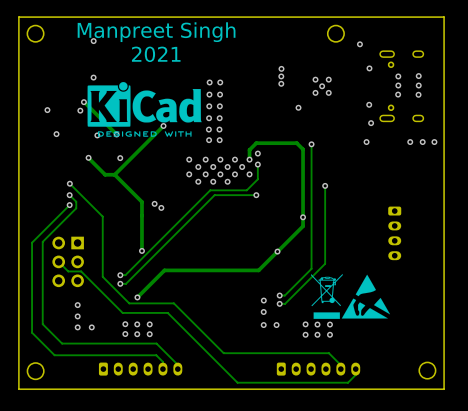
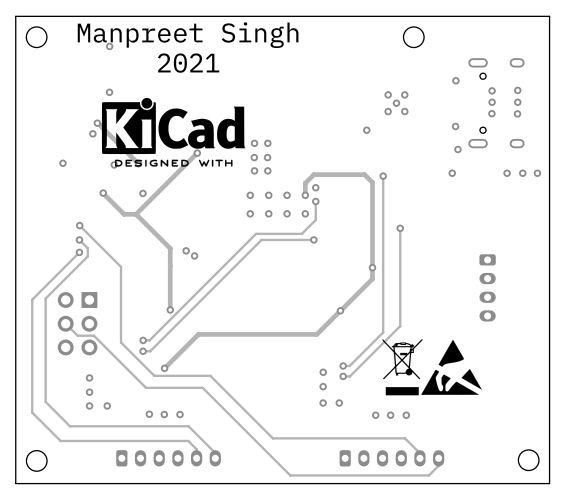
via: (359, 44) -> none
via: (281, 68) -> none
via: (281, 76) -> none
via: (209, 82) -> none
via: (220, 82) -> none
via: (281, 83) -> none
via: (209, 94) -> none
via: (220, 94) -> none
via: (209, 106) -> none
via: (219, 106) -> none
via: (47, 110) -> none
via: (189, 159) -> none
via: (198, 167) -> none
via: (213, 167) -> none
via: (227, 167) -> none
via: (242, 167) -> none
via: (189, 174) -> none
via: (198, 181) -> none
via: (213, 181) -> none
via: (227, 181) -> none
via: (125, 324) -> none
via: (137, 324) -> none
via: (149, 324) -> none
via: (305, 324) -> none
via: (317, 324) -> none
via: (329, 324) -> none

